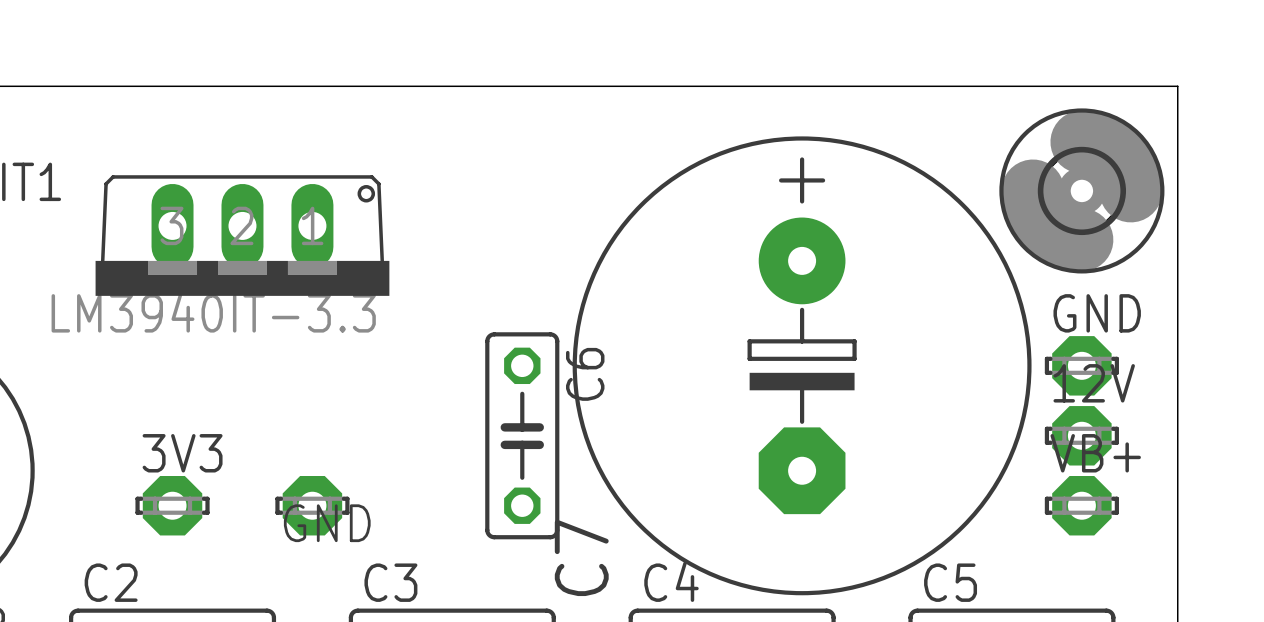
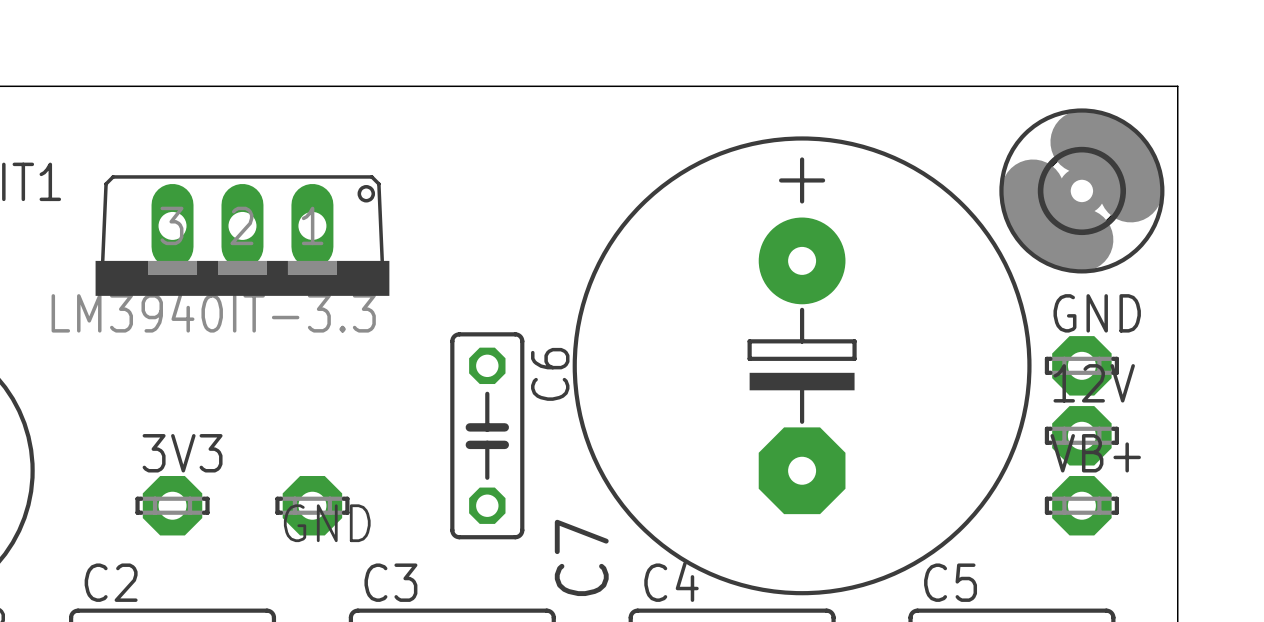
C6 position: (522, 435) -> (487, 435)

